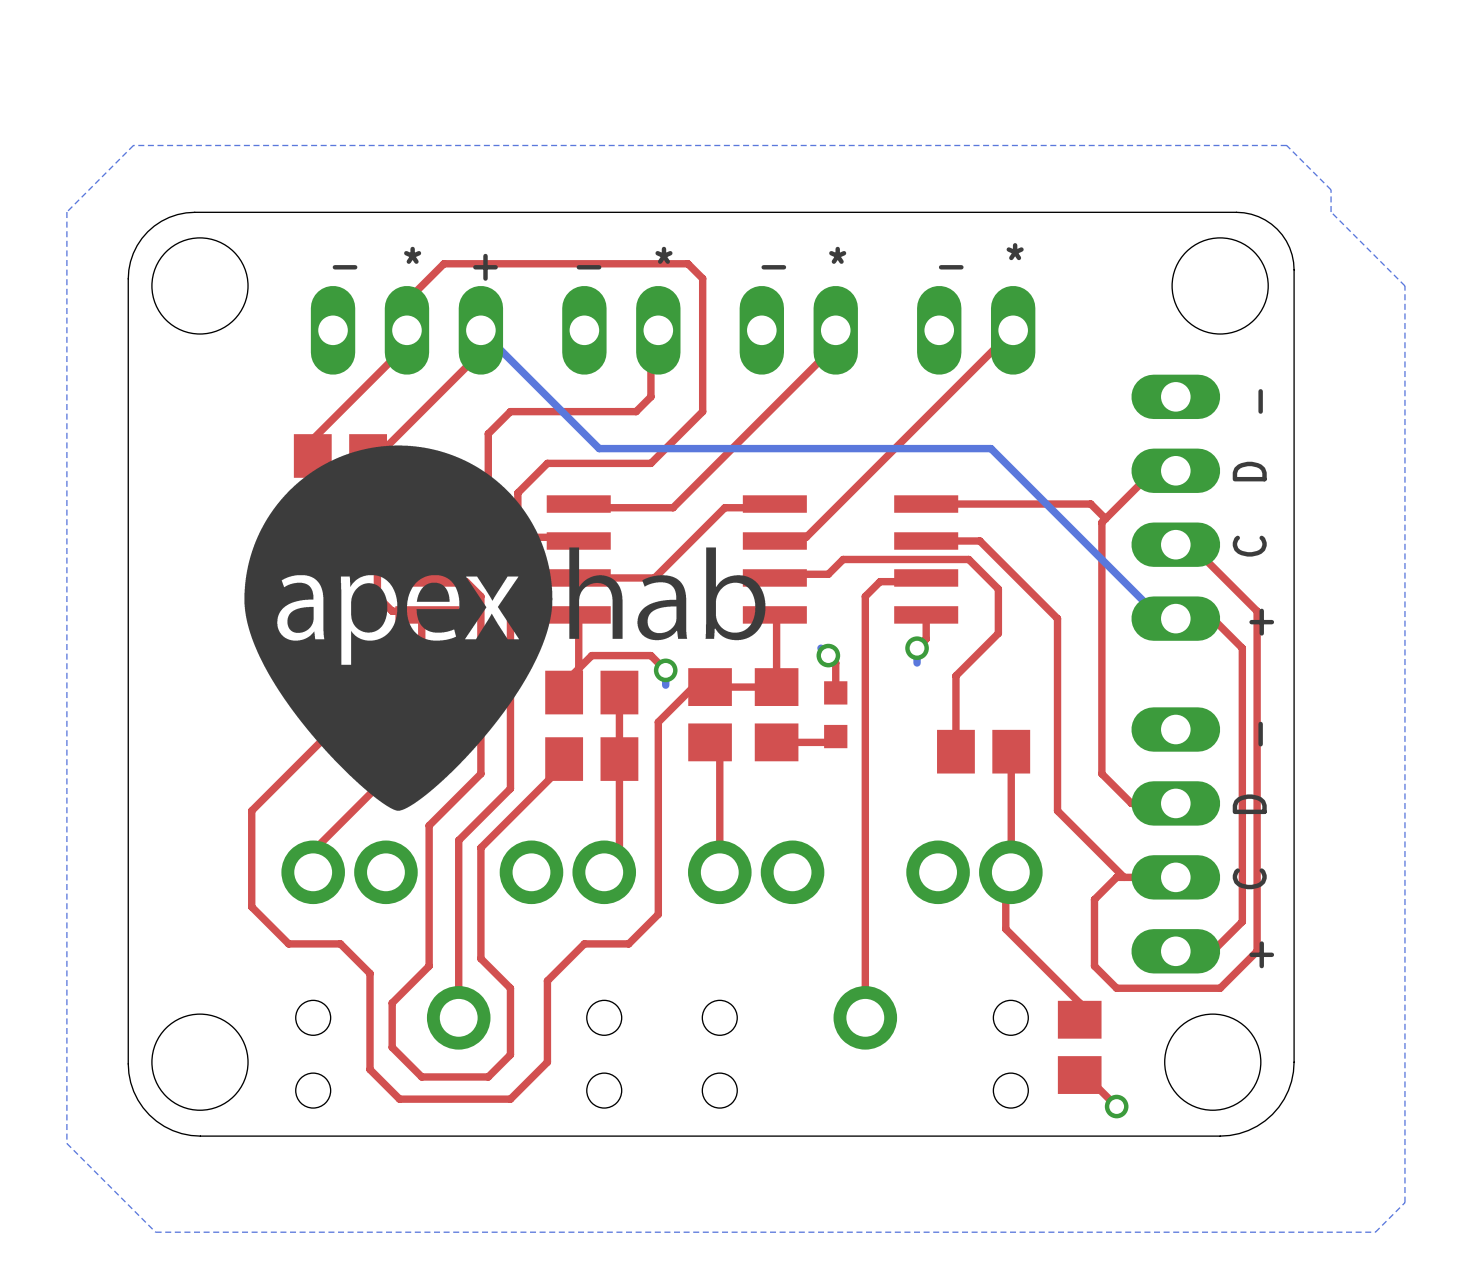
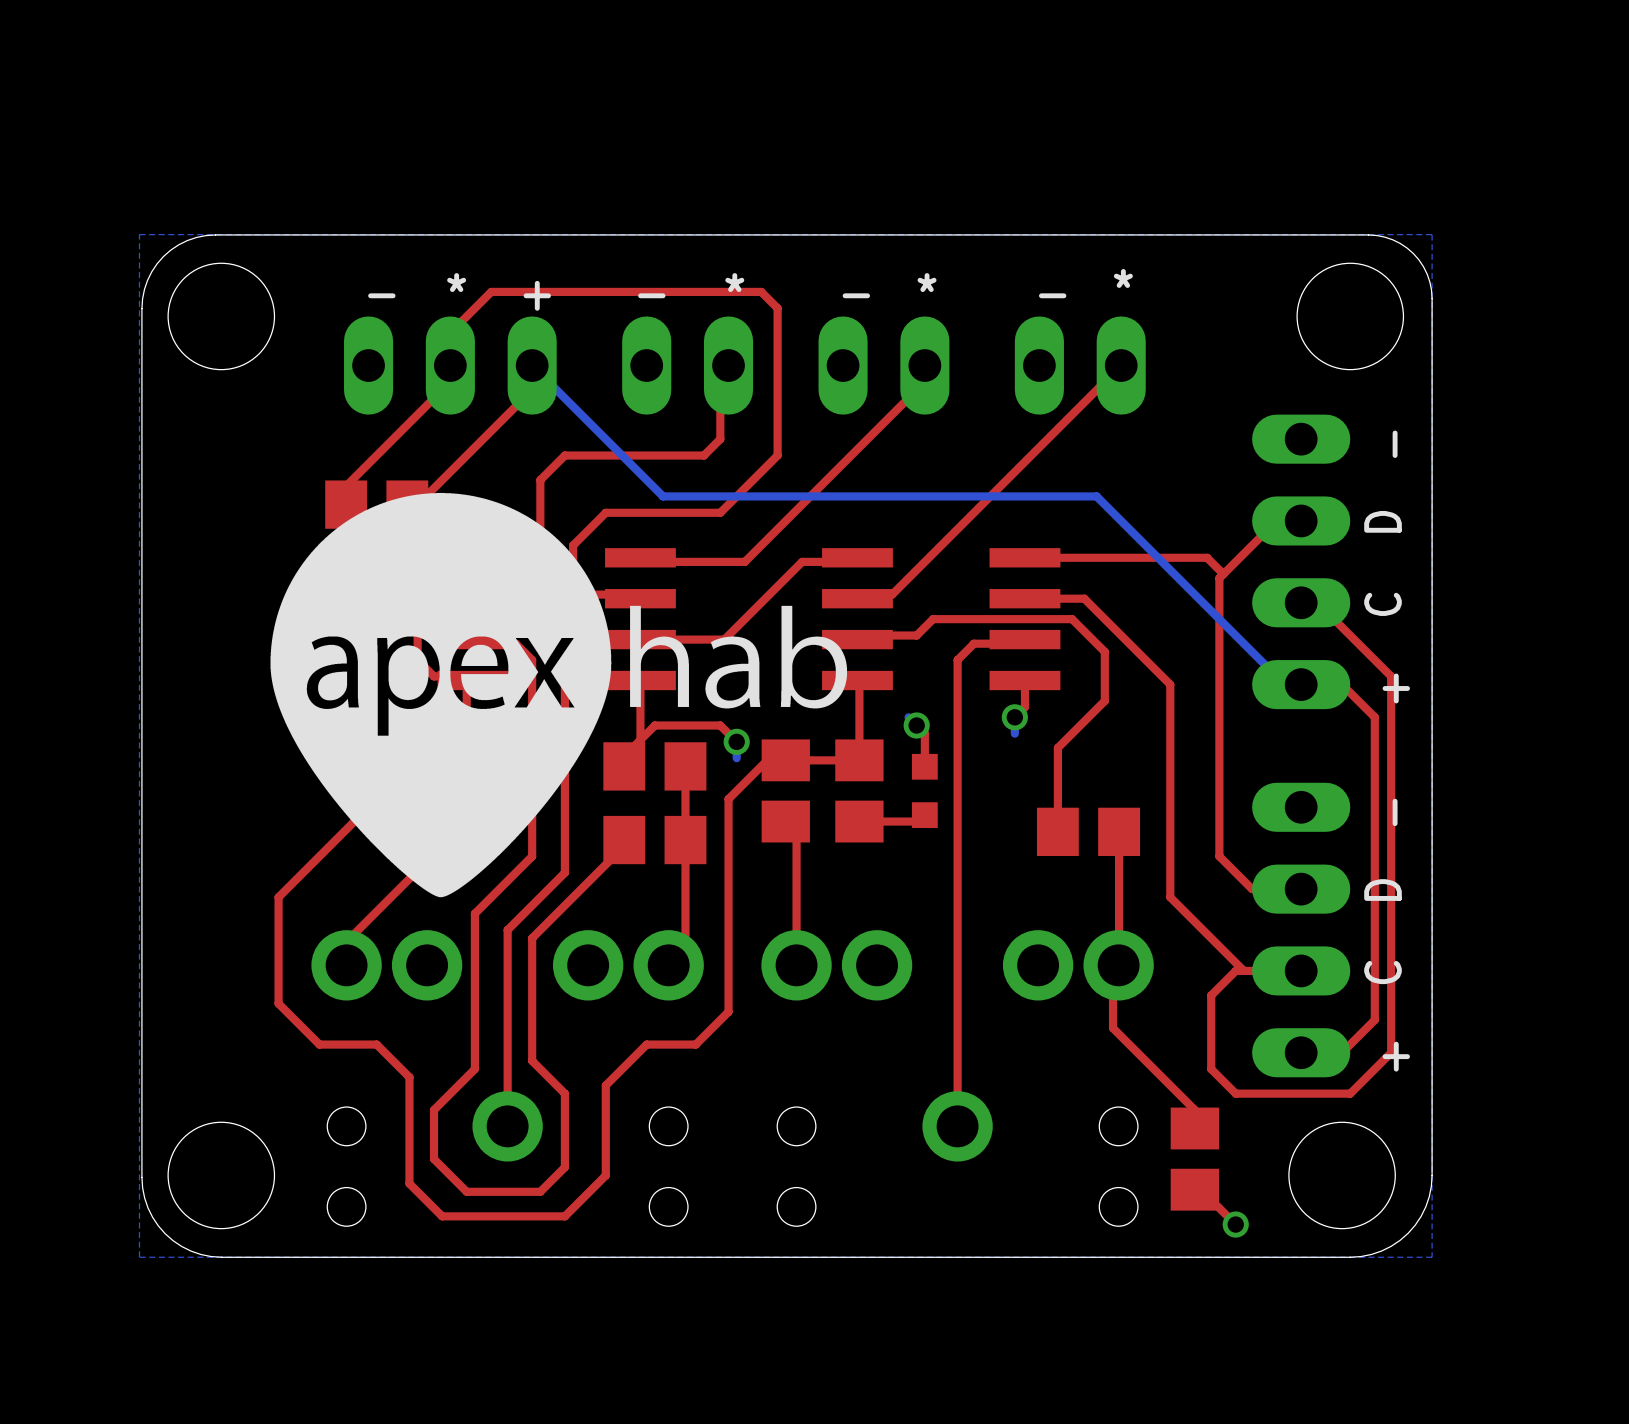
bottom zone outline: (1286, 145) (1331, 189) (1331, 212) (1404, 285) (1404, 1202) (1375, 1232) (155, 1232) (66, 1143) (66, 212) (133, 145) (1286, 145) -> (1432, 234) (1432, 1257) (139, 1257) (139, 234) (1432, 234)

